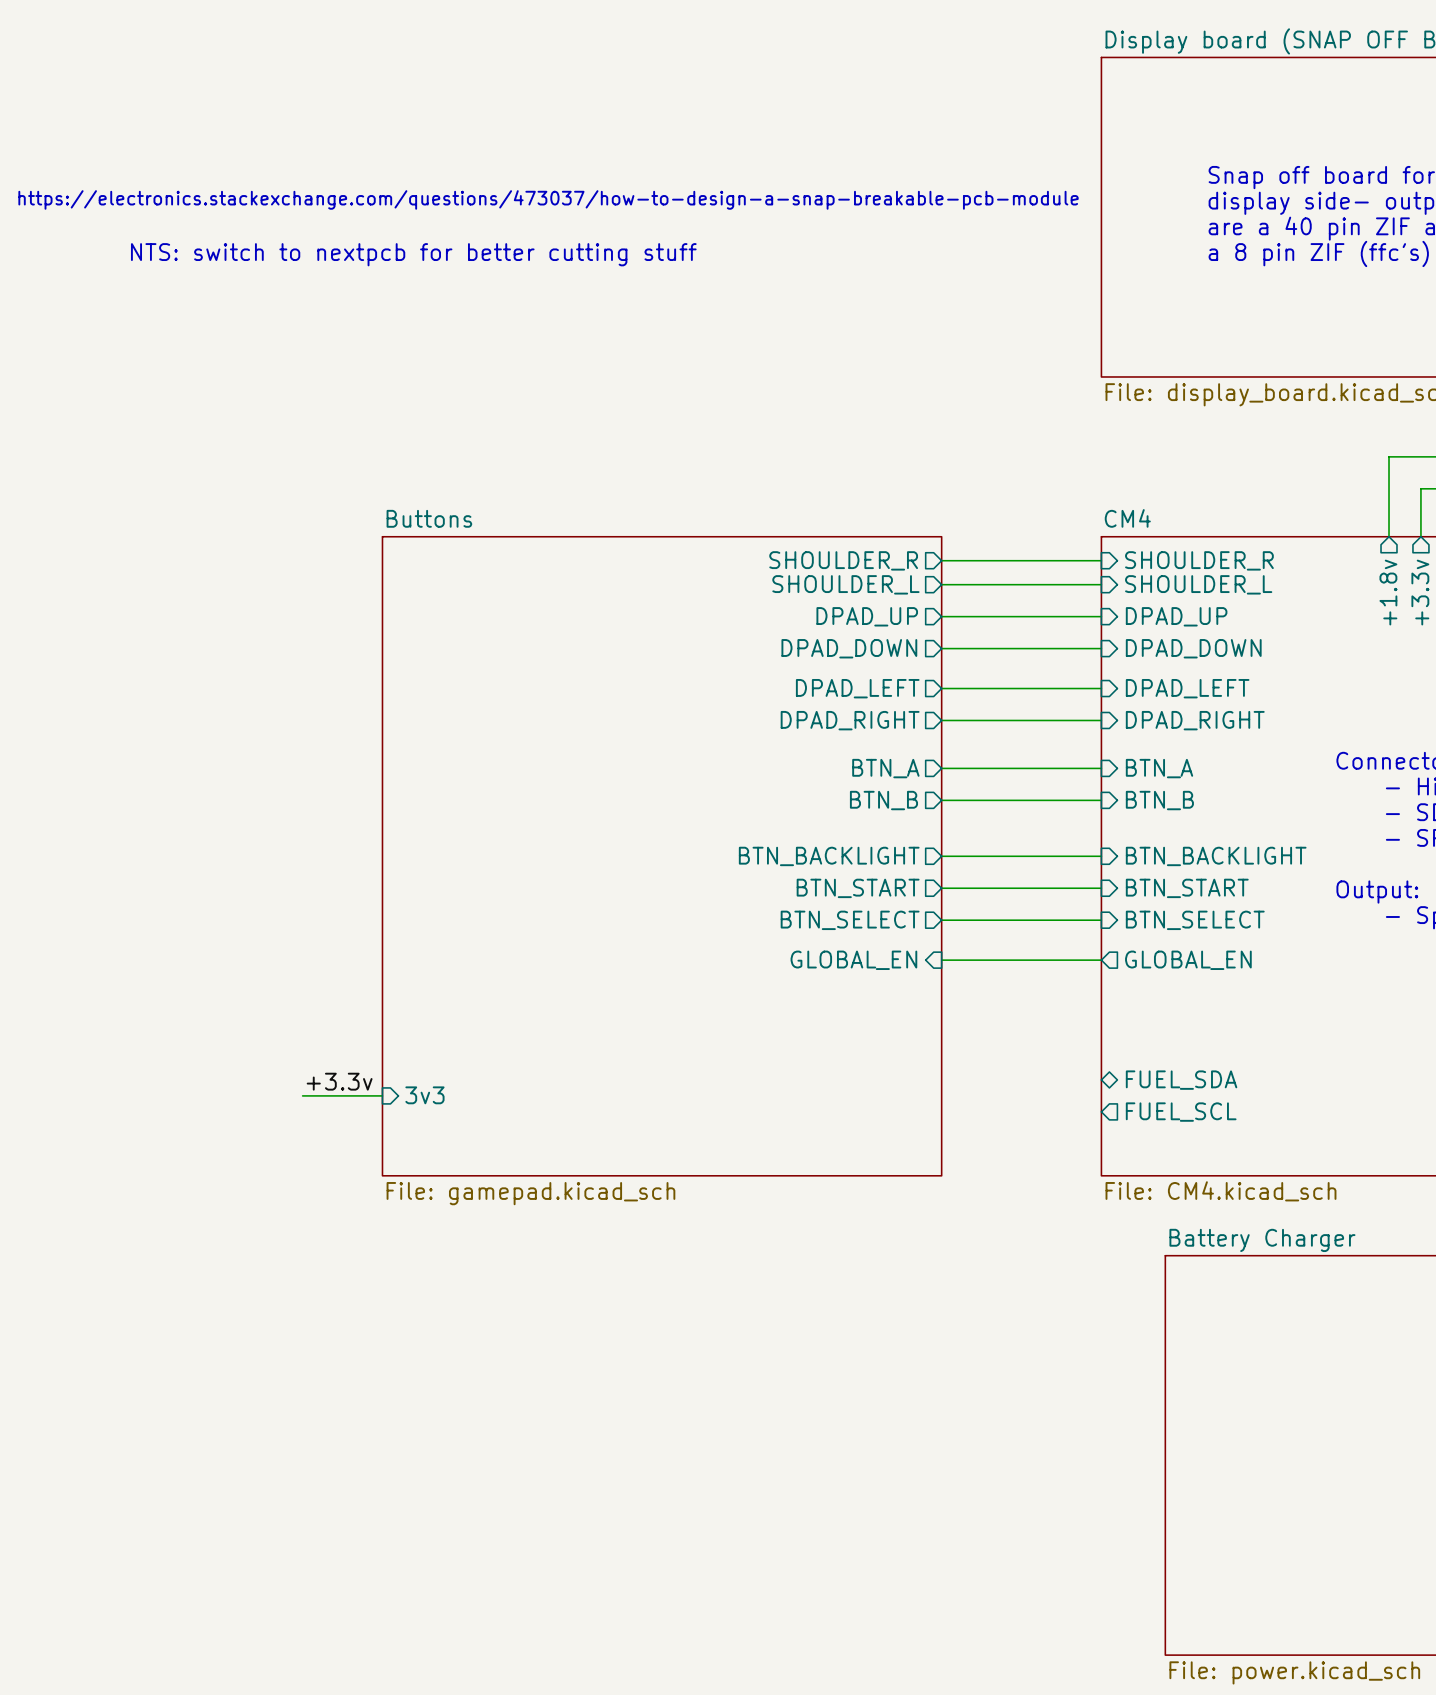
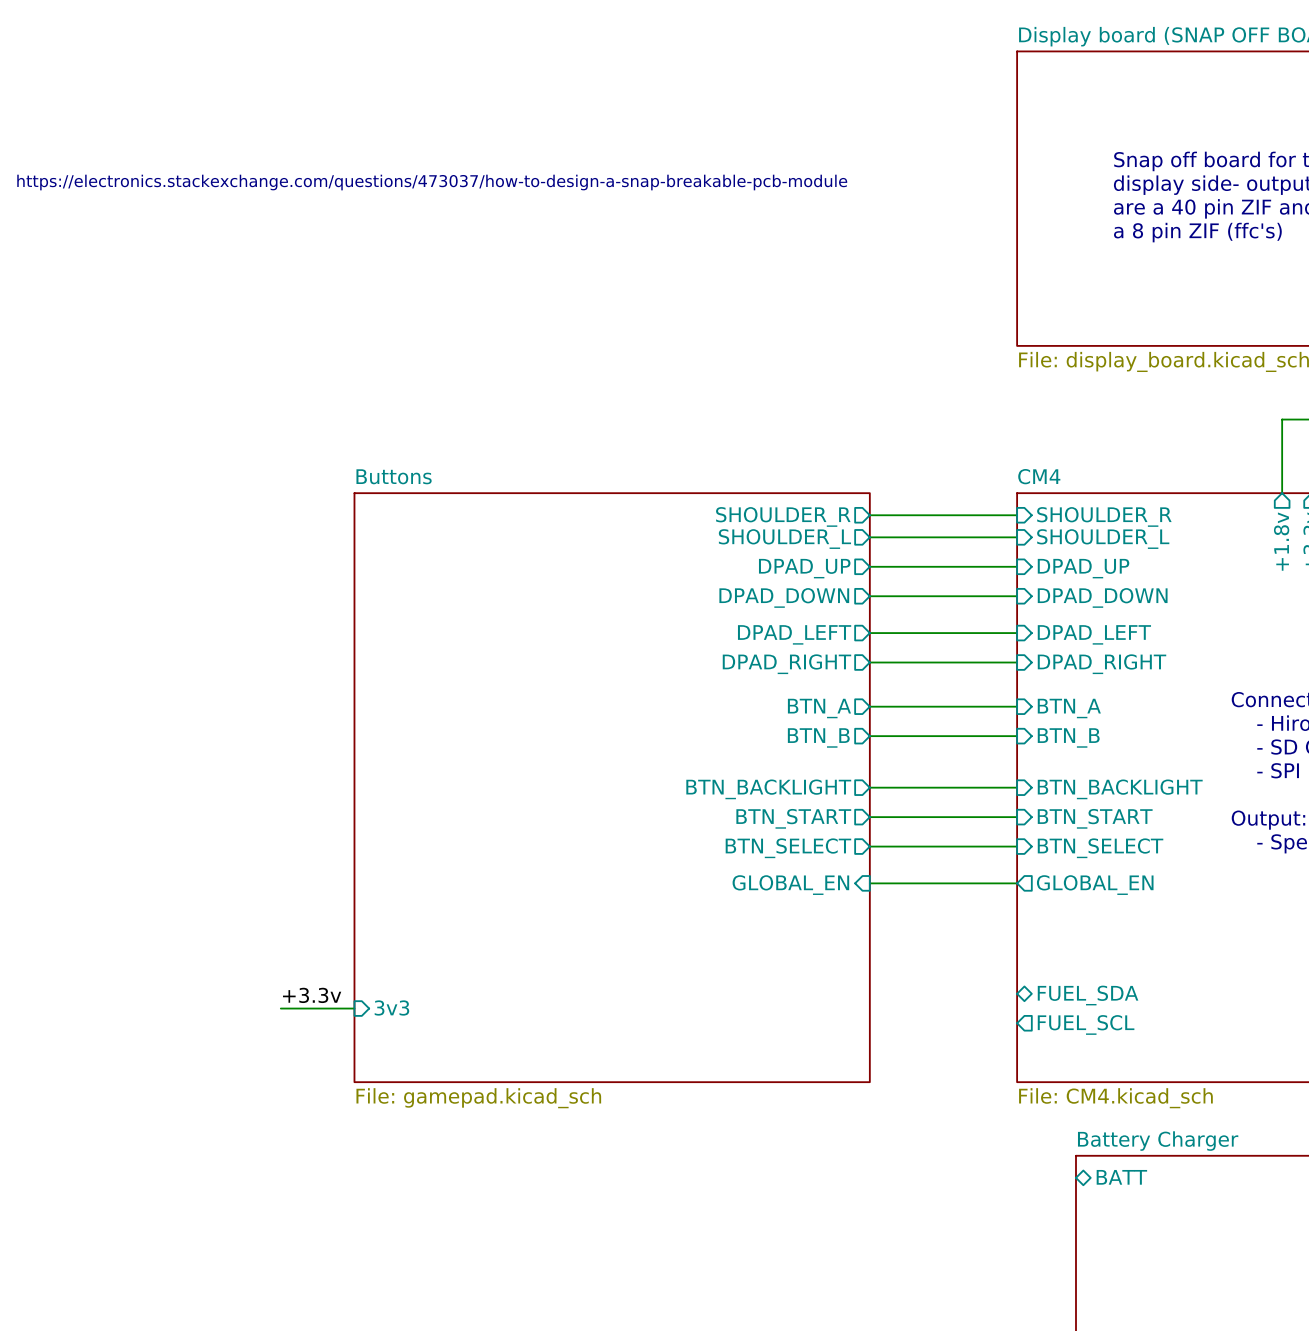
text: NTS: switch to nextpcb for better cutting stuff (413, 254) -> none
sheet pin: none -> BATT (1121, 1177)

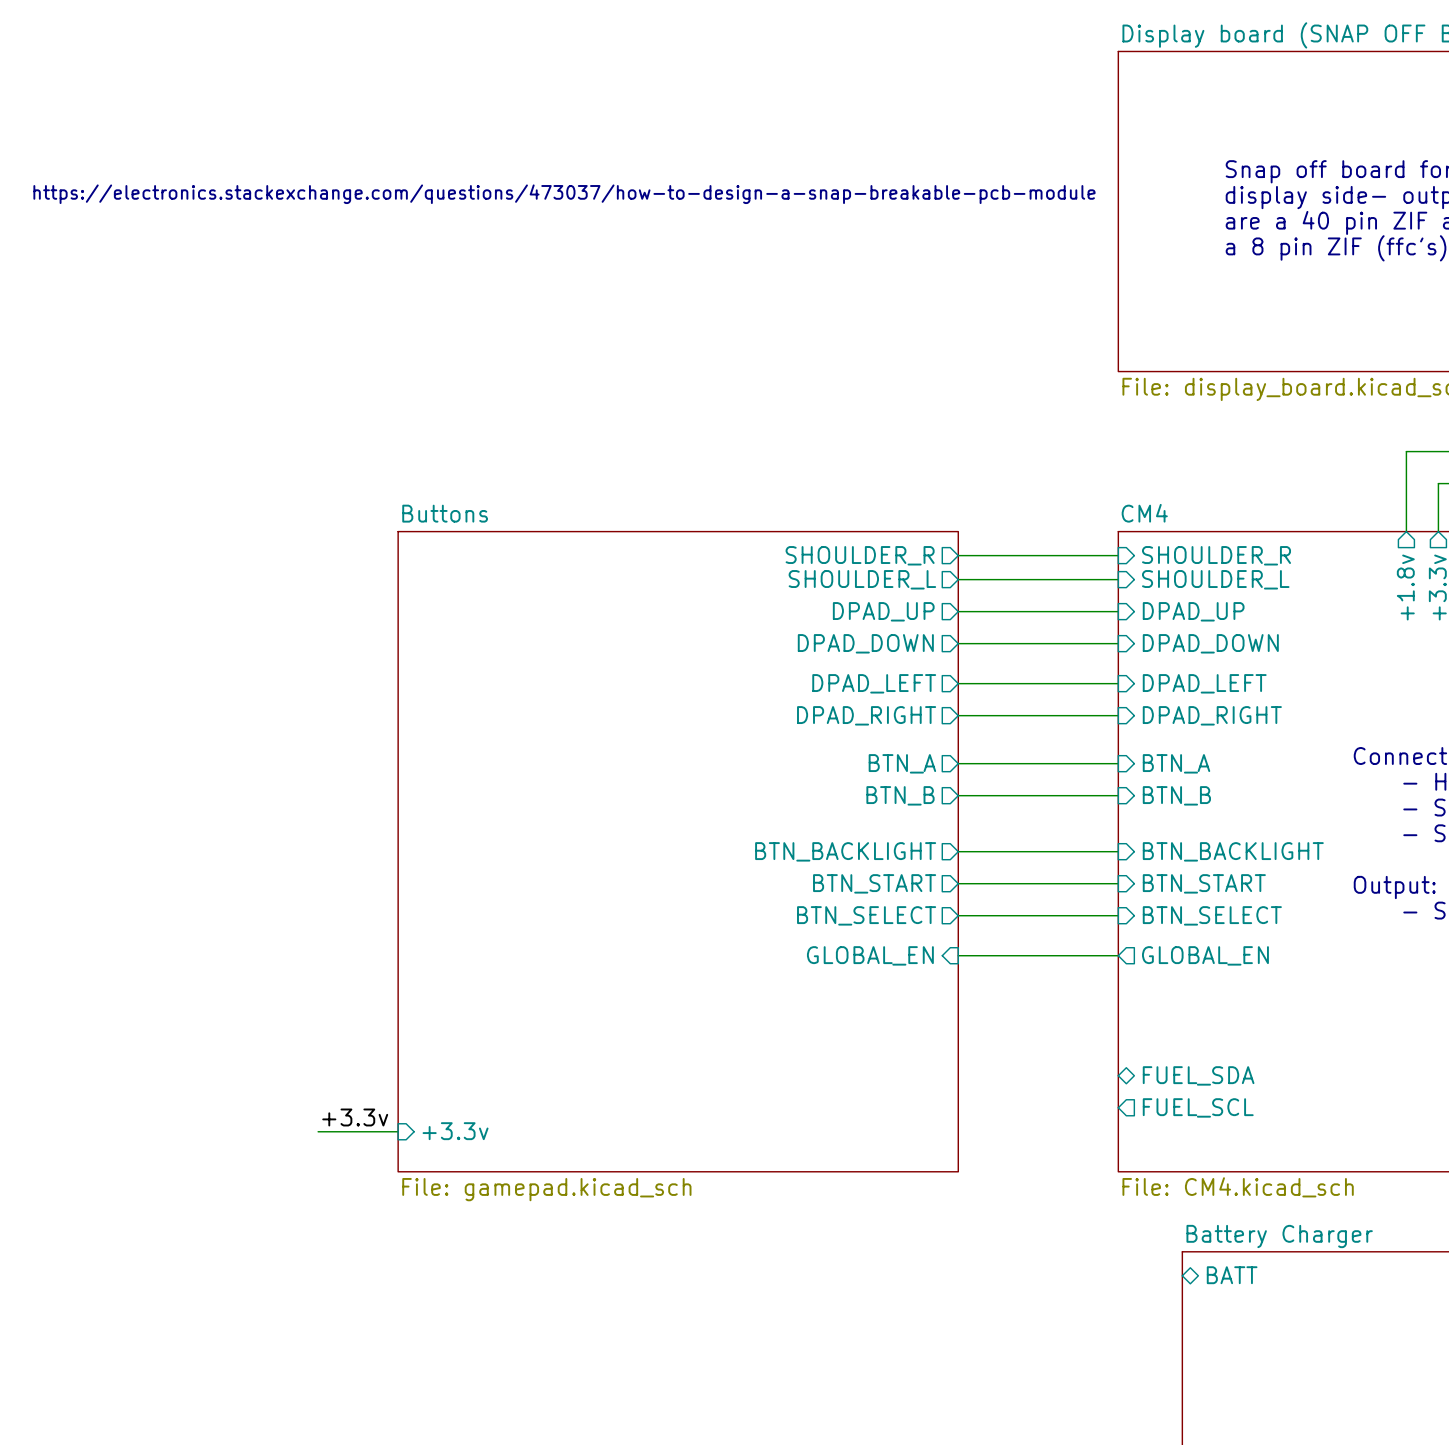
label position: +3.3v (312, 995) -> +3.3v (355, 1117)
wire: (280, 1008) (354, 1008) -> (318, 1131) (398, 1131)
sheet pin: 3v3 (391, 1008) -> none
sheet pin: none -> +3.3v (455, 1131)

